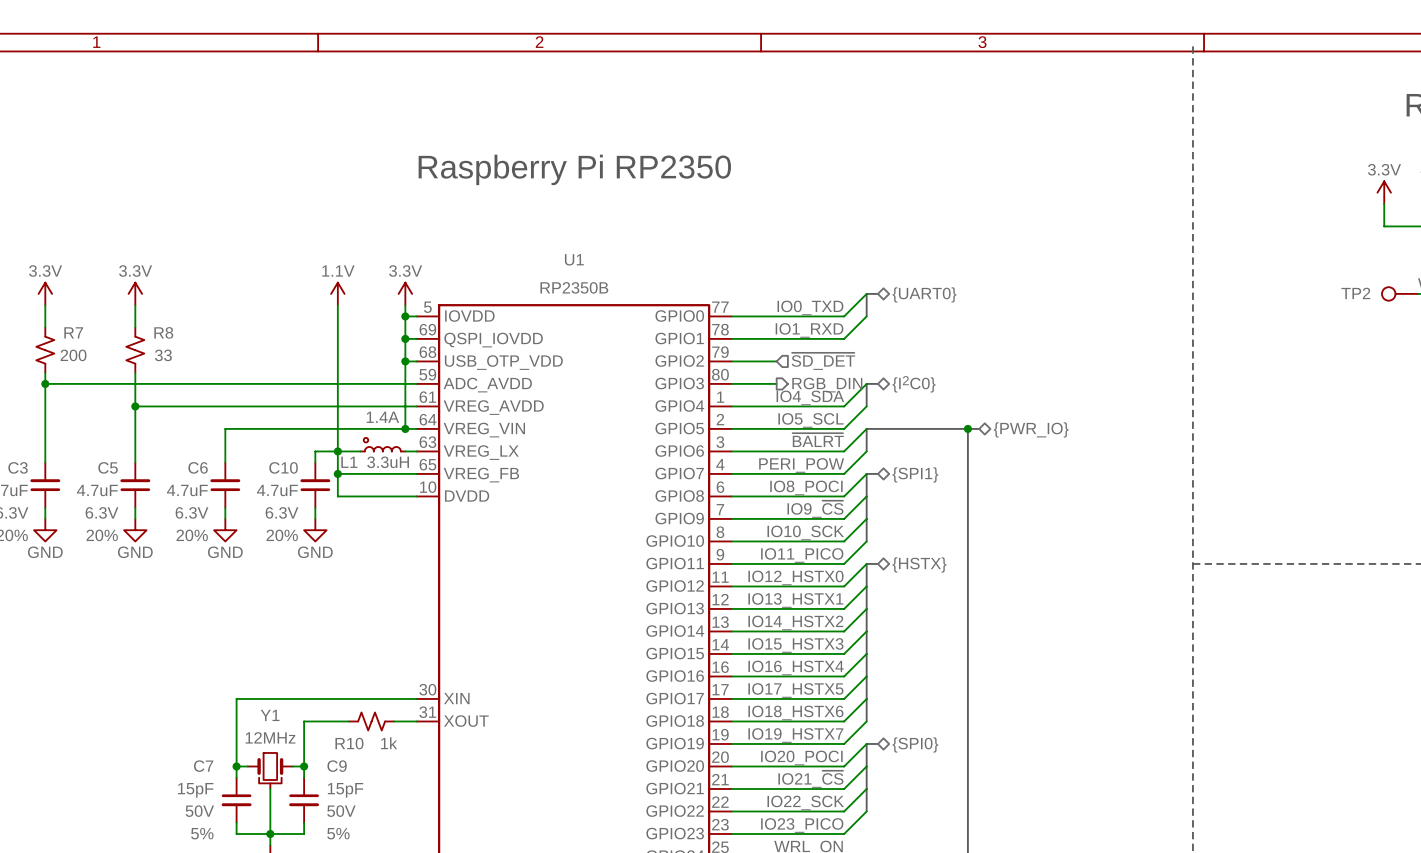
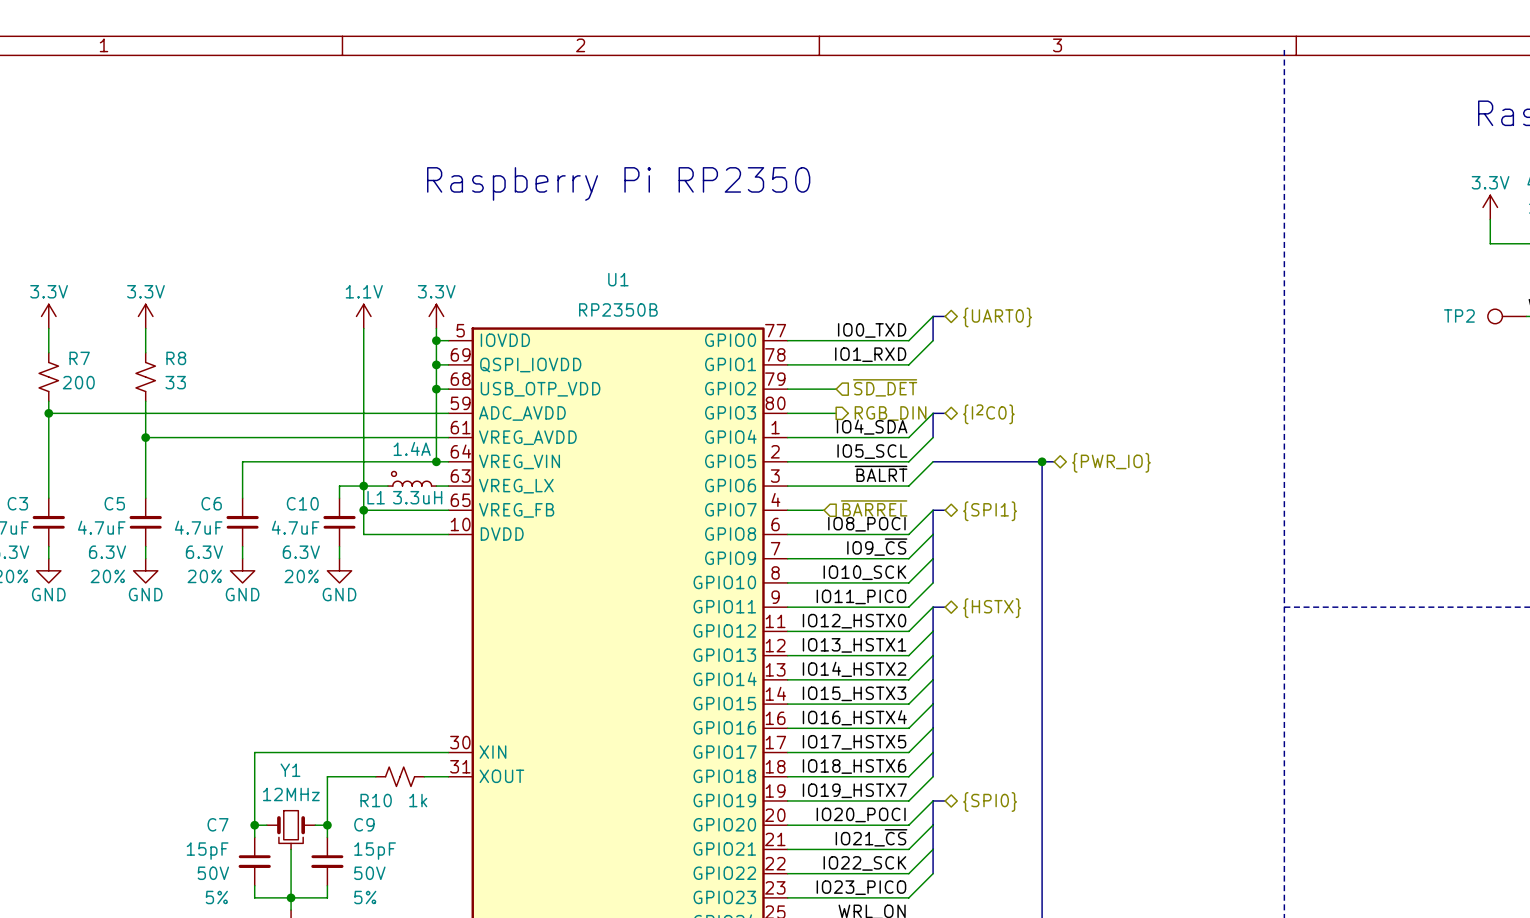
bus: (866, 428) (866, 451) -> none
wire: (866, 451) (844, 473) (765, 473) -> none
label: PERI_POW (801, 465) -> none
hierarchical label: none -> ~{BARREL} (874, 508)

